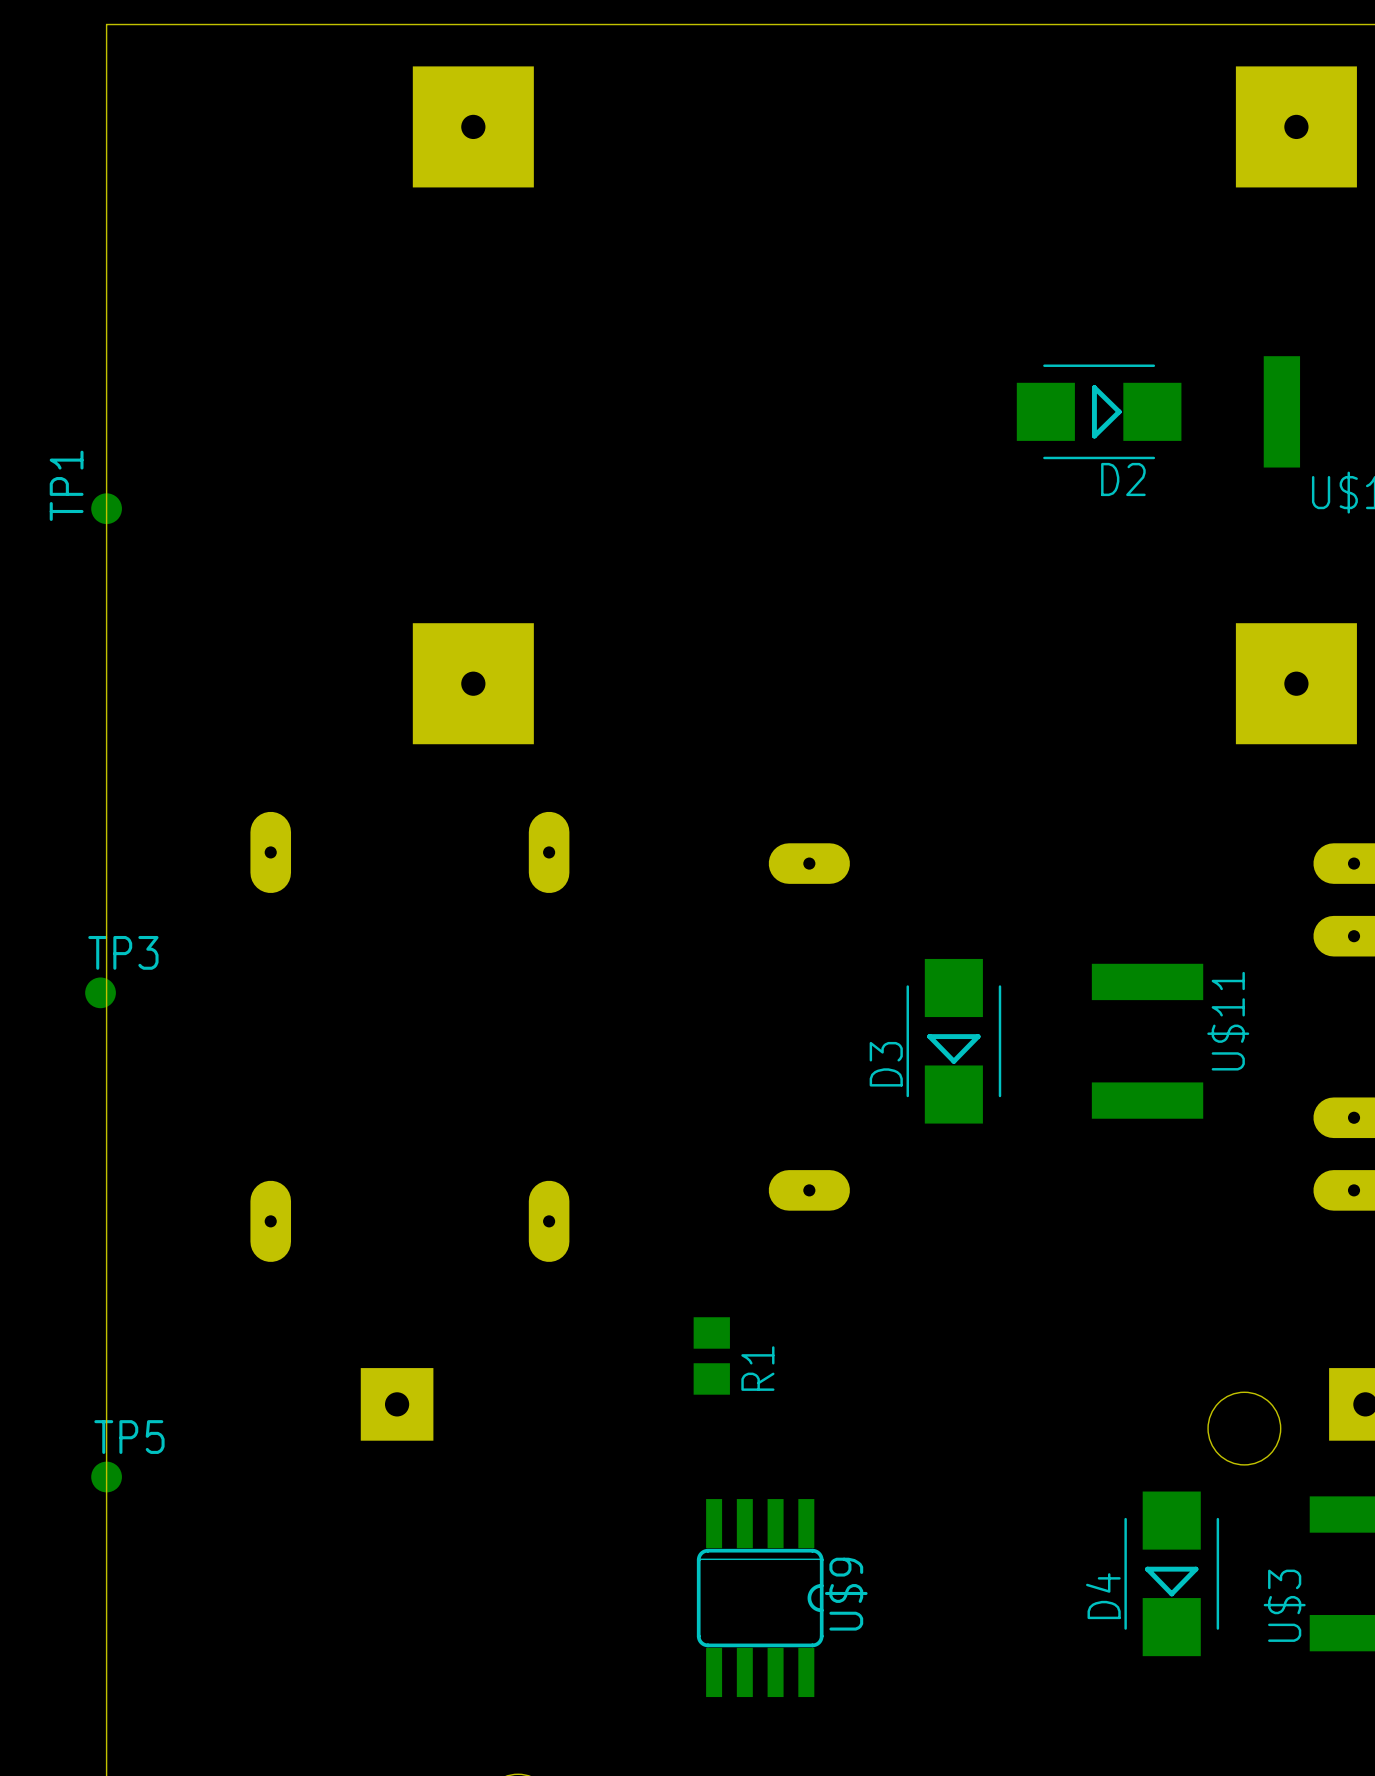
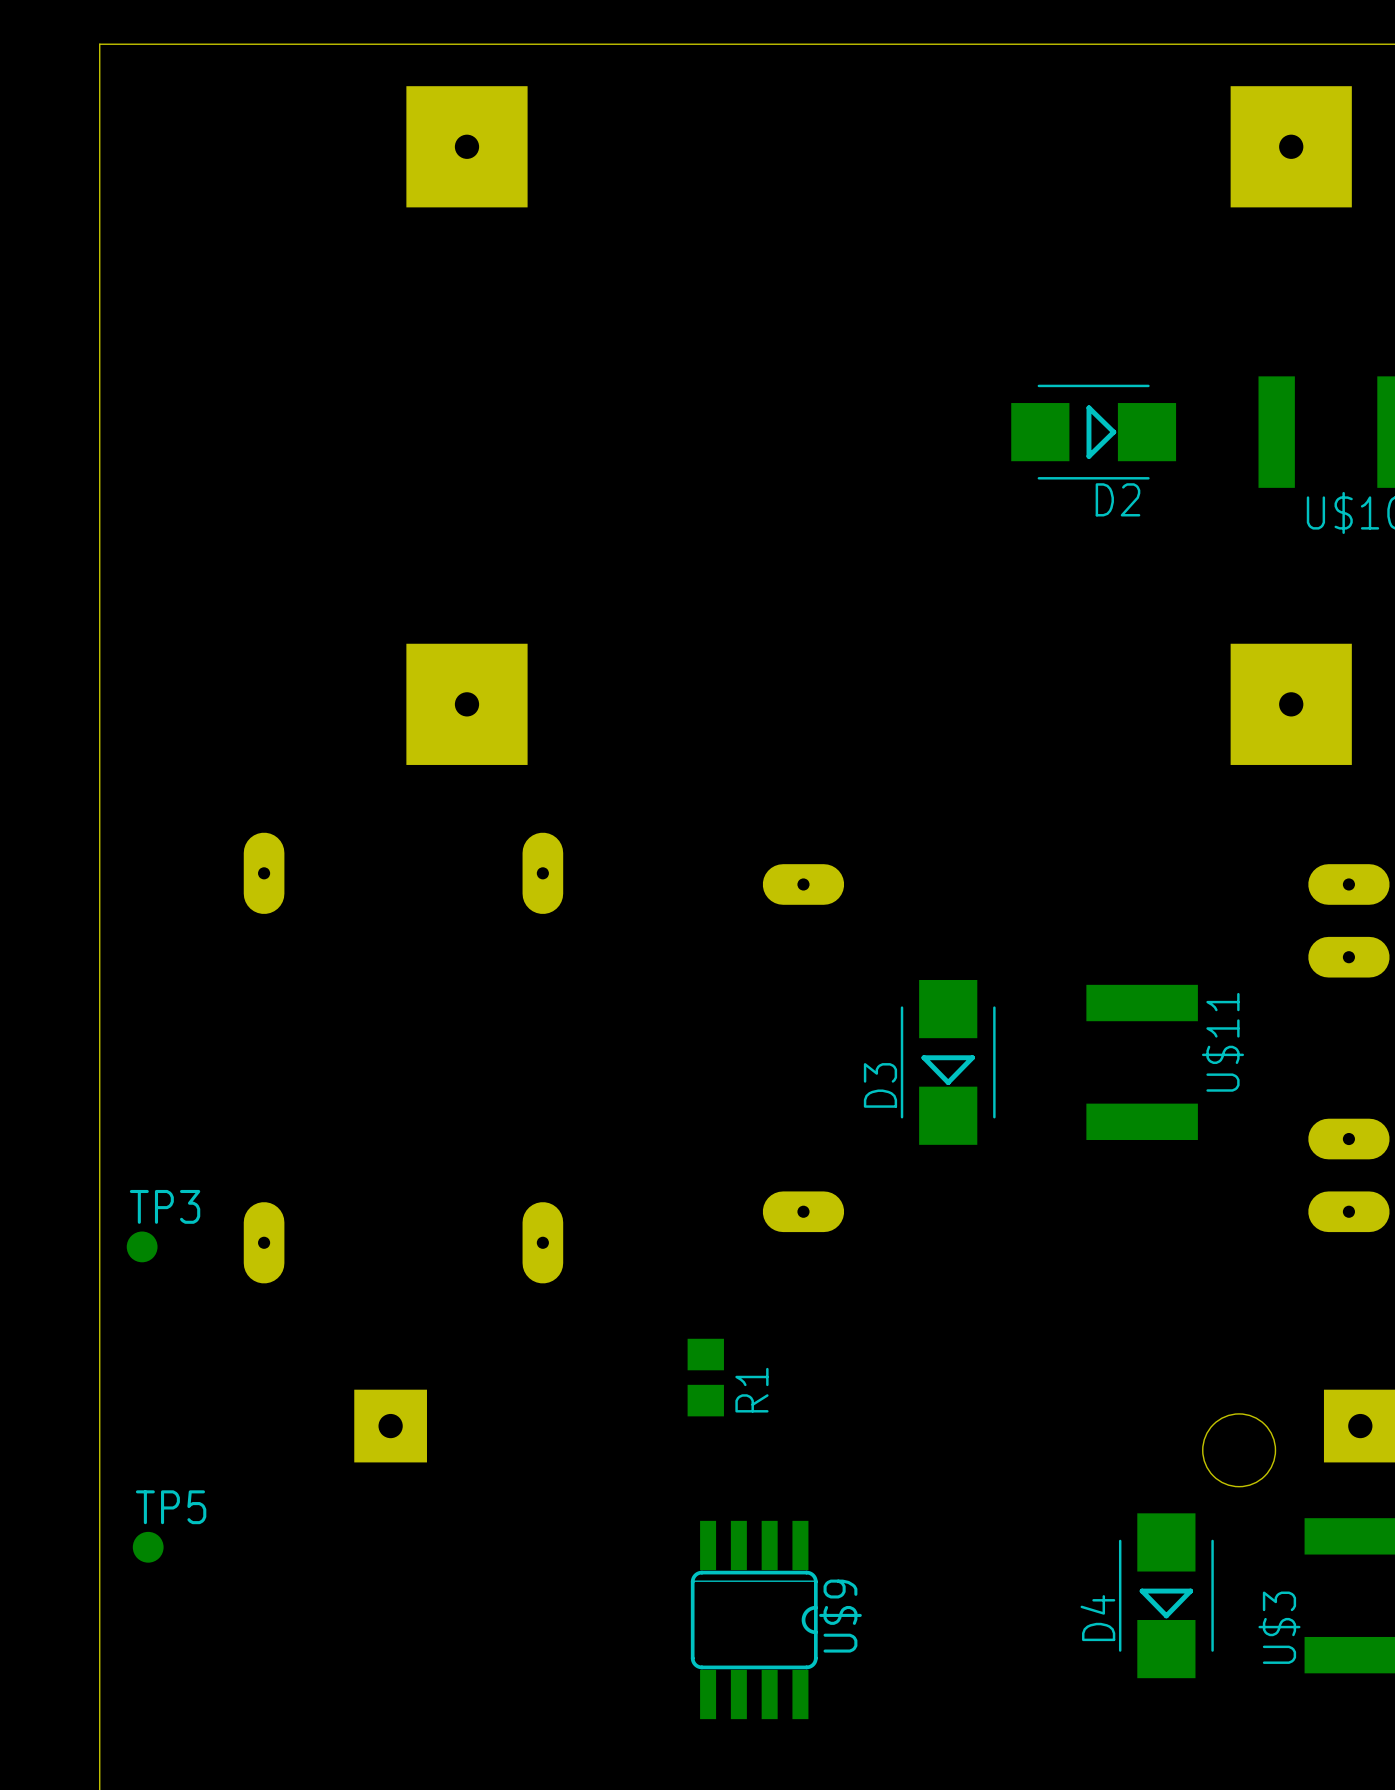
TP1: (106, 508) -> none
TP3 position: (100, 992) -> (142, 1246)
TP5 position: (106, 1477) -> (148, 1547)

